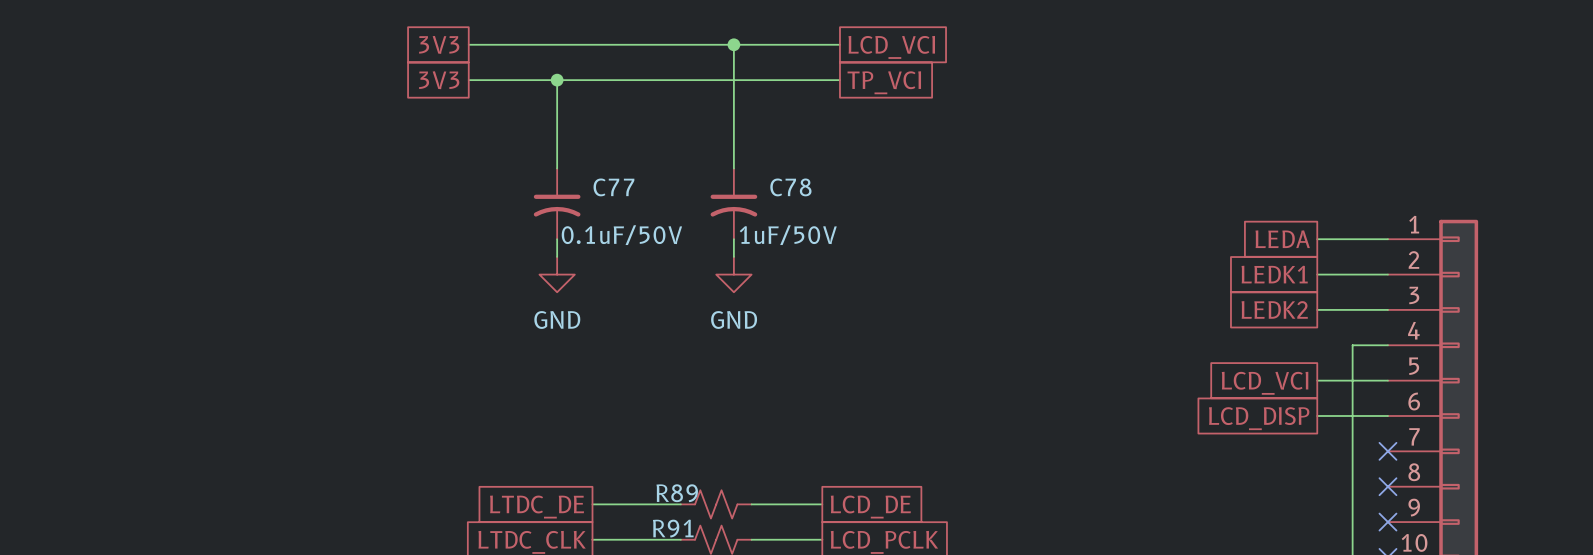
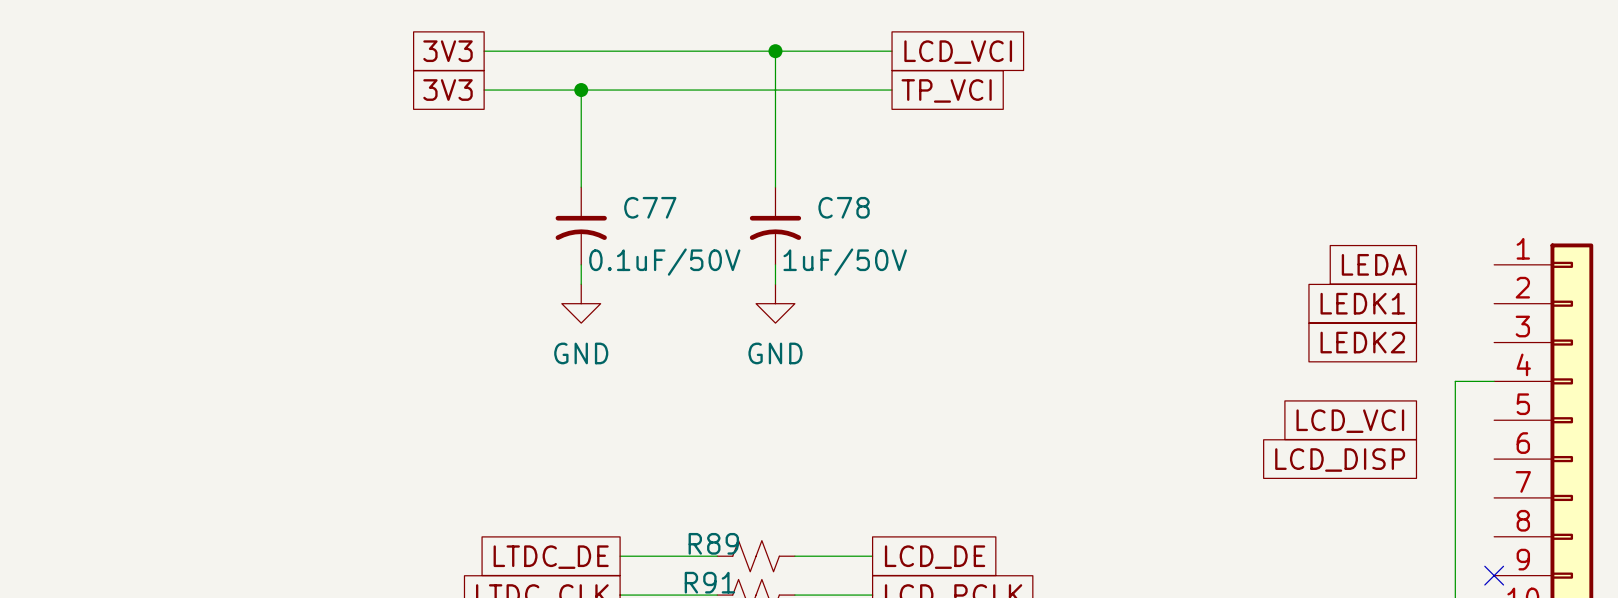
wire: (1317, 239) (1387, 239) -> none
wire: (1317, 274) (1387, 274) -> none
wire: (1317, 309) (1387, 309) -> none
wire: (1317, 380) (1387, 380) -> none
wire: (1317, 415) (1387, 415) -> none
no-connect mark: (1387, 451) -> none
no-connect mark: (1387, 486) -> none

